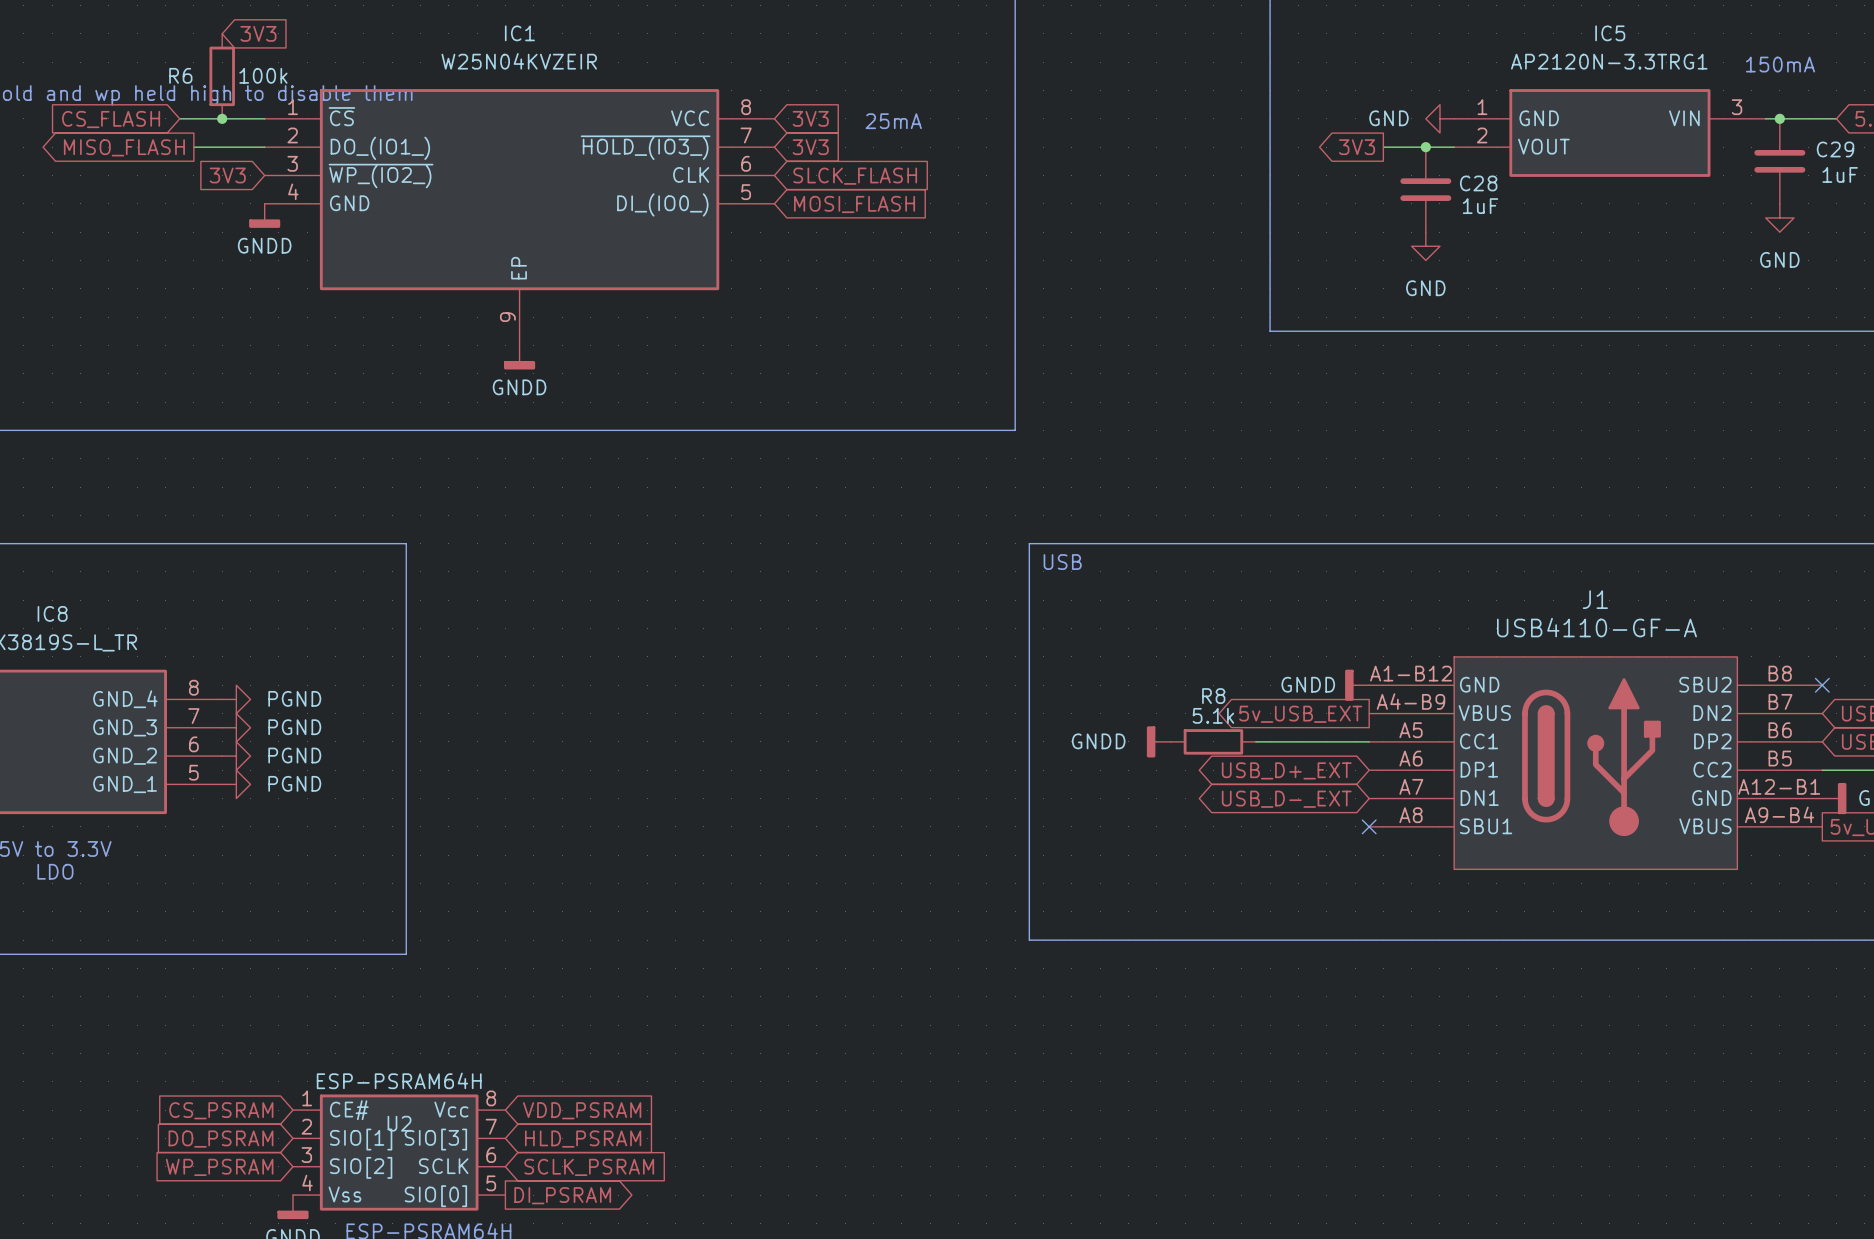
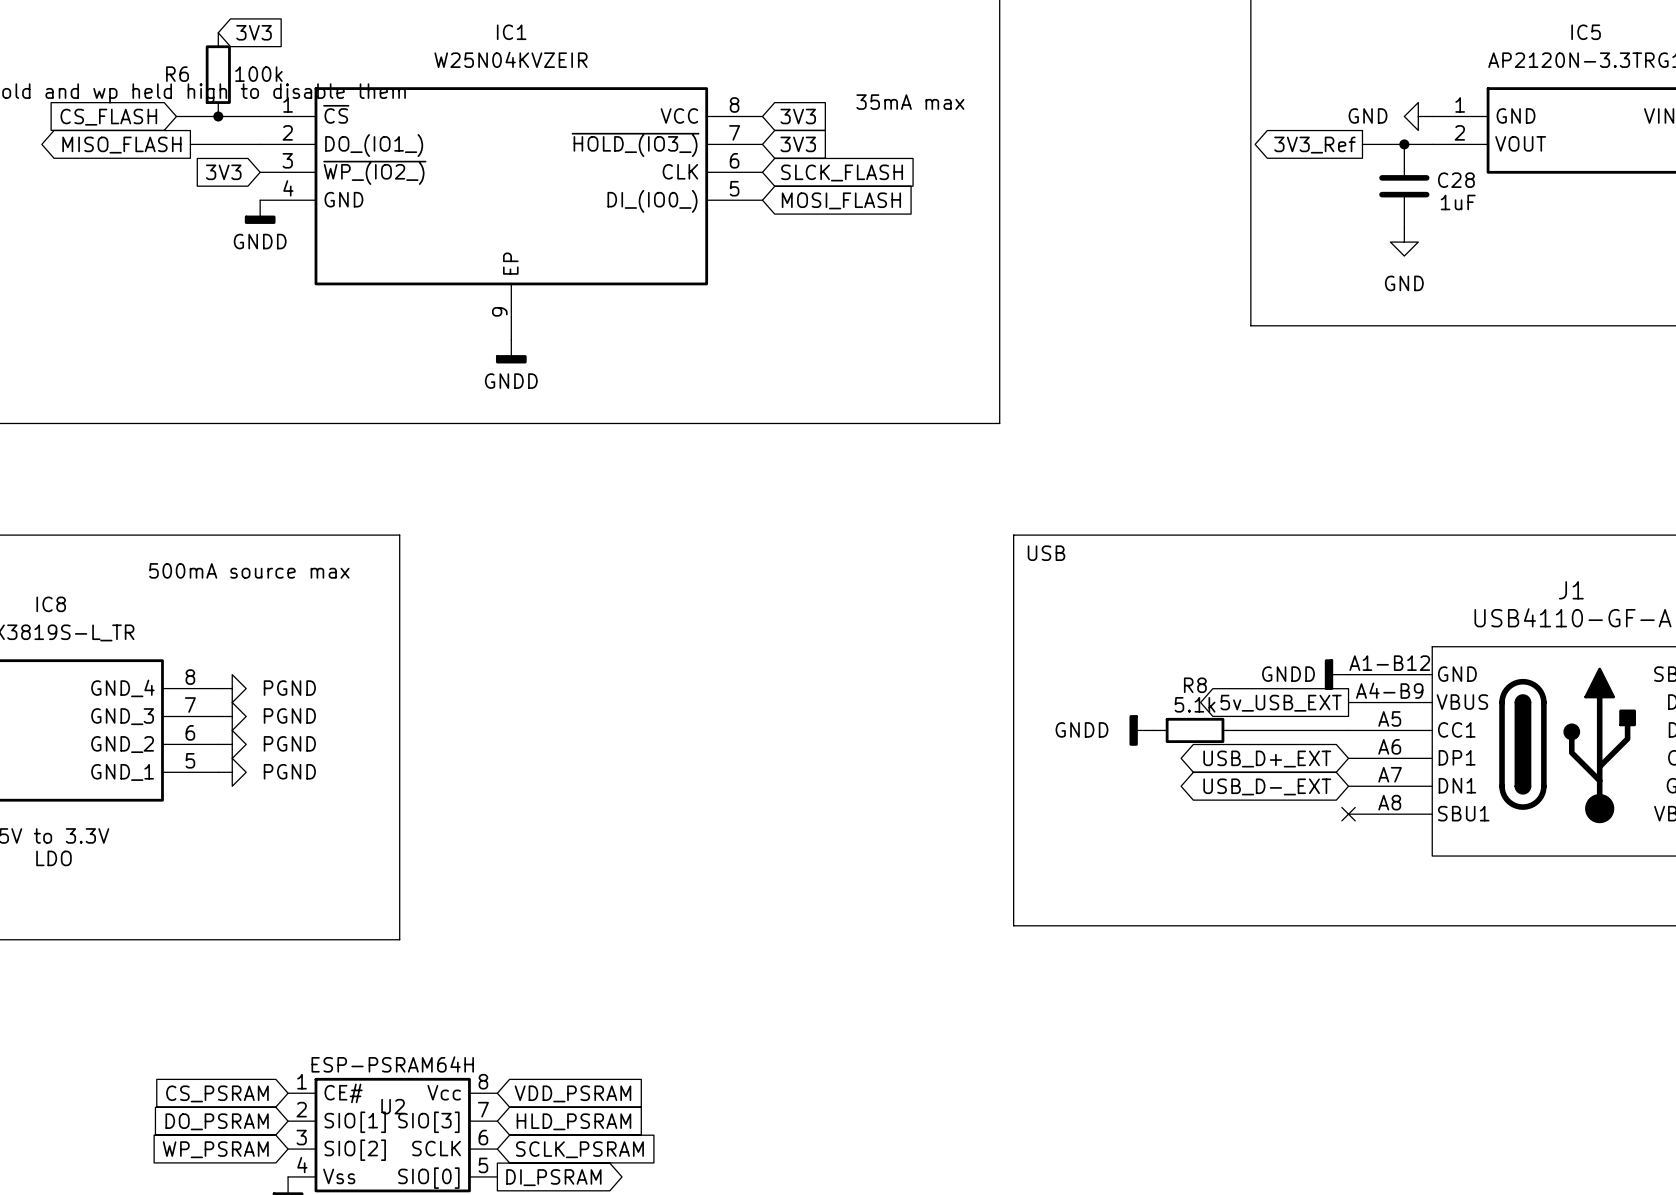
text: none -> 35mA max (910, 102)
text: 25mA (893, 121) -> none
global label: 3V3 (1357, 147) -> 3V3_Ref (1314, 145)
text: none -> 500mA source max (249, 570)

